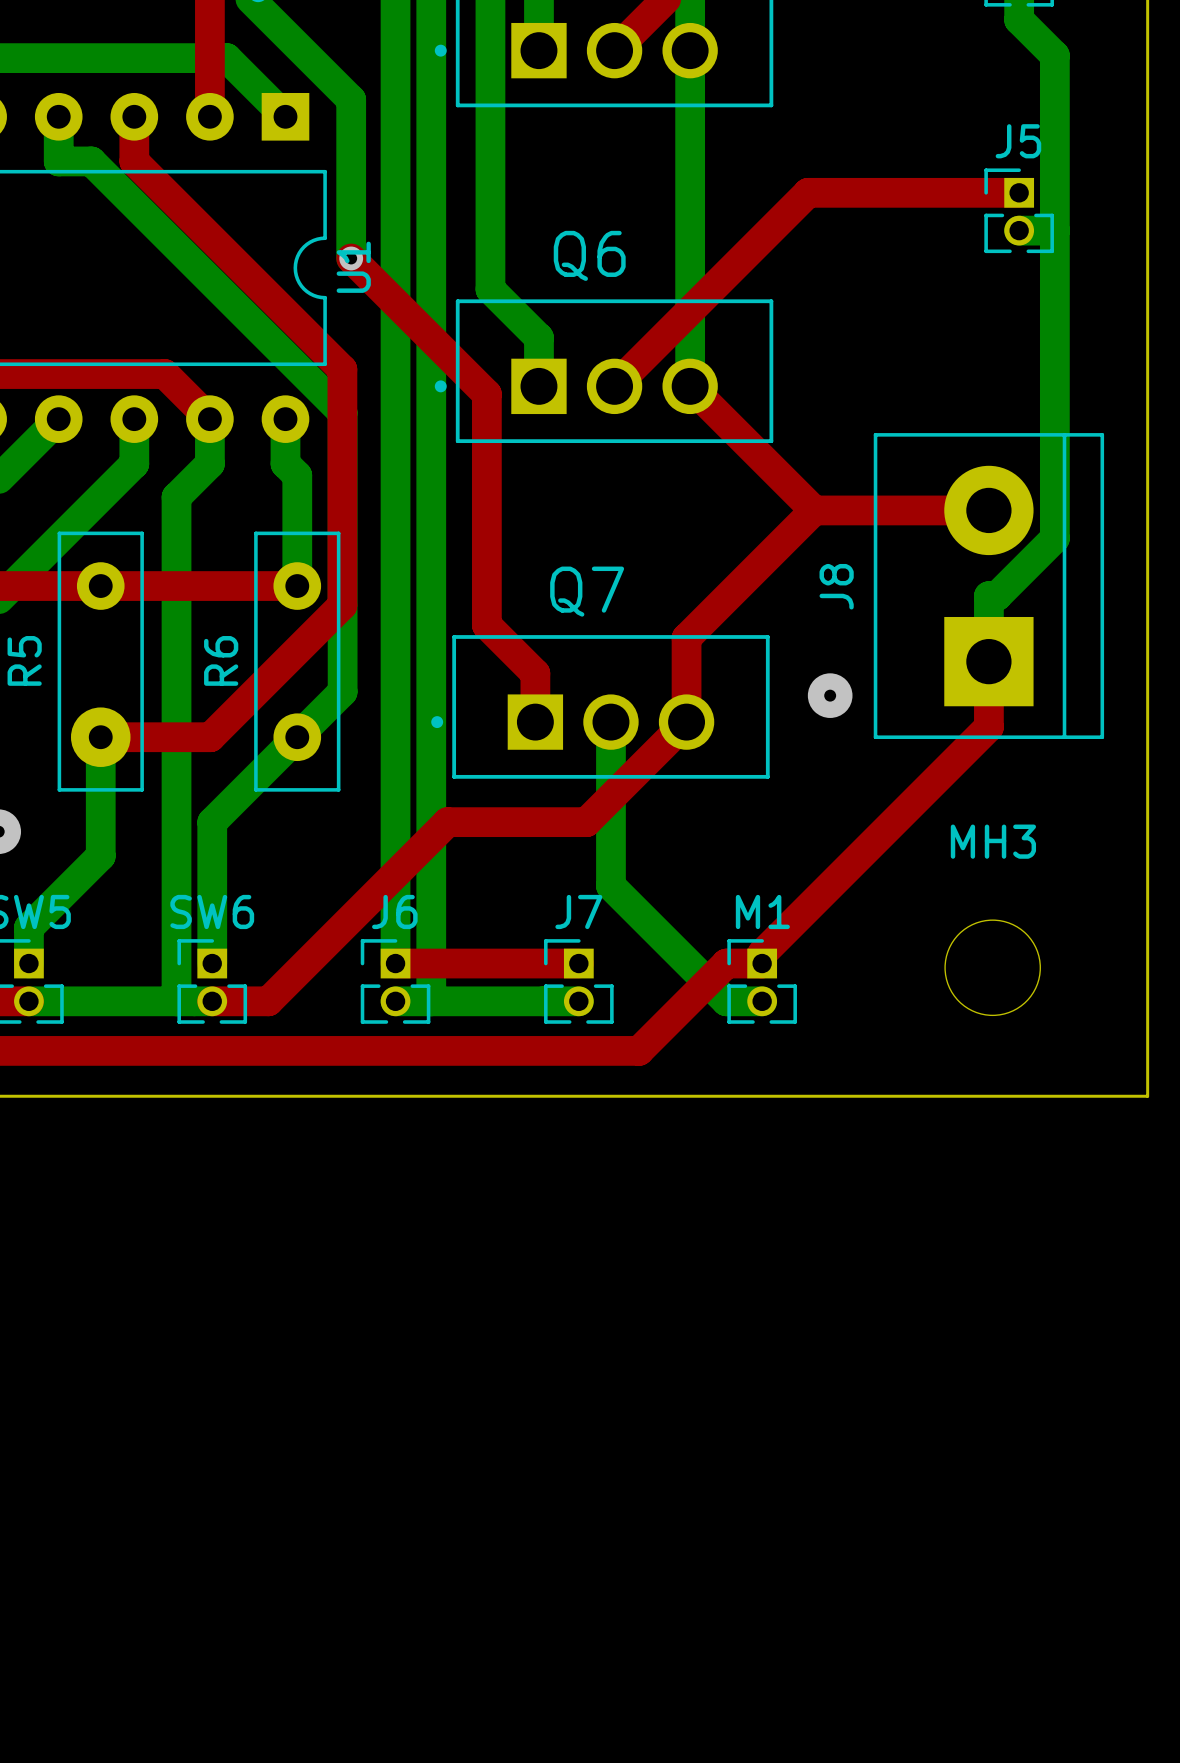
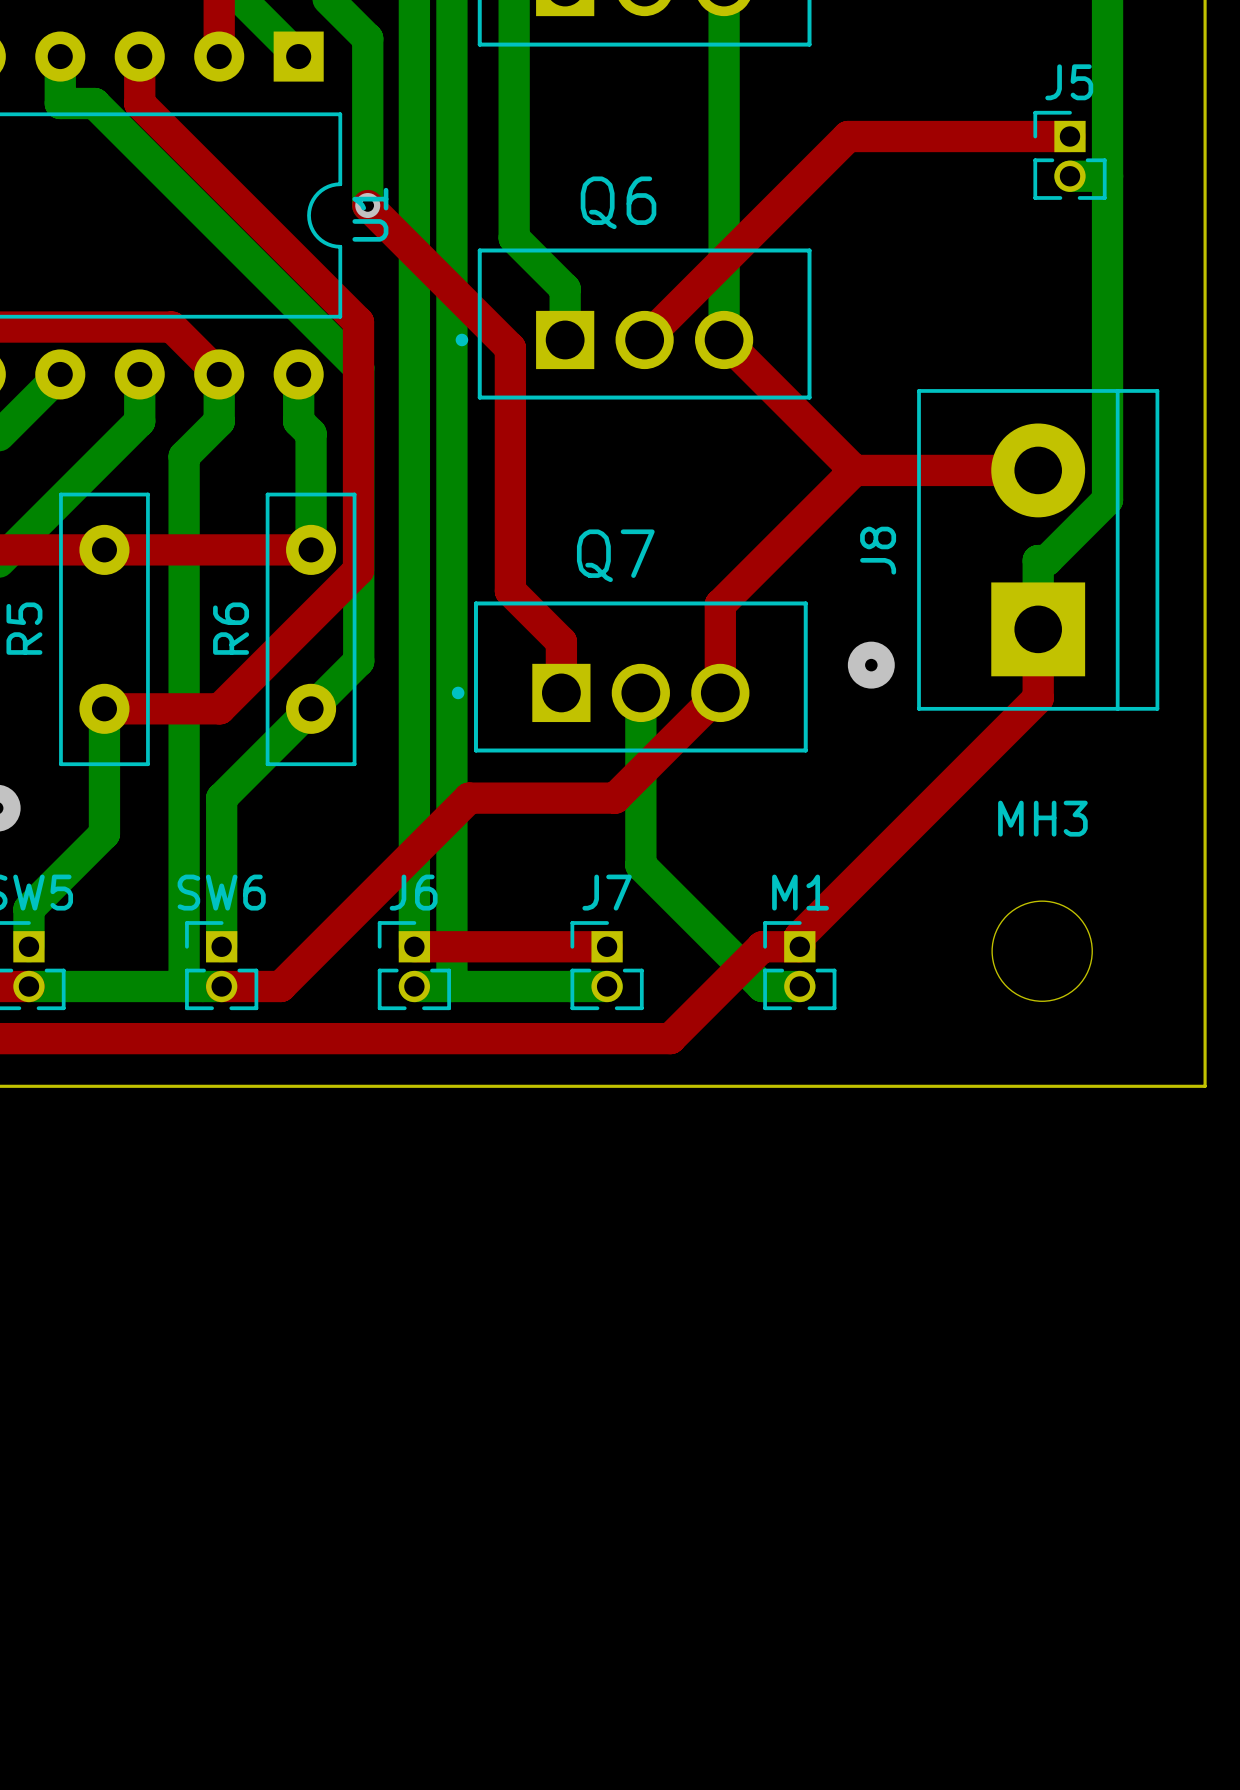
R5 footprint: [57, 531, 144, 792] -> [59, 492, 150, 767]

